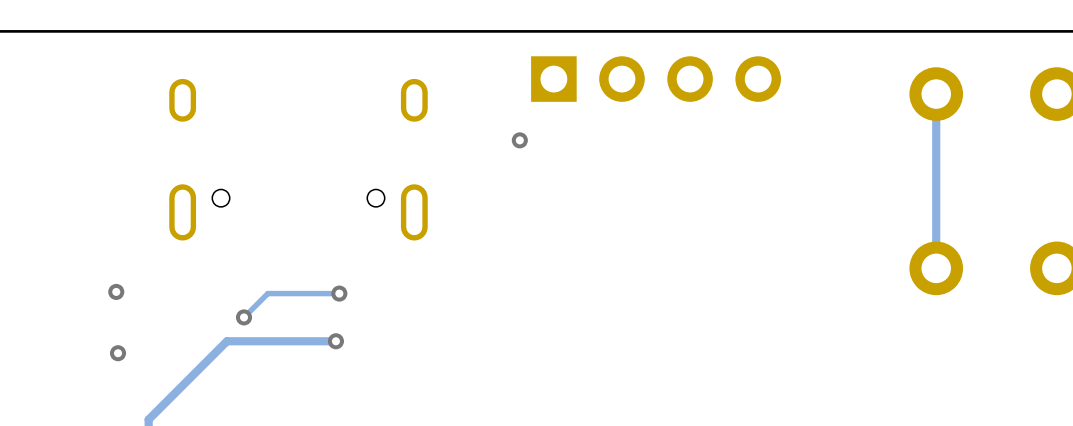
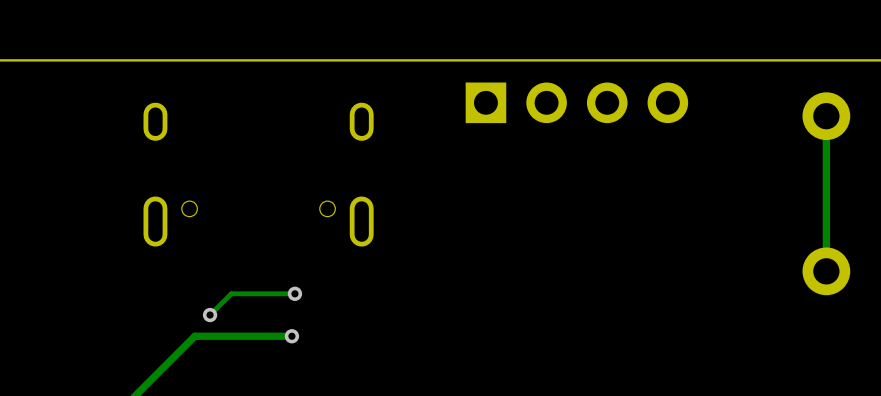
via: (519, 140) -> none
via: (116, 291) -> none
via: (118, 353) -> none

